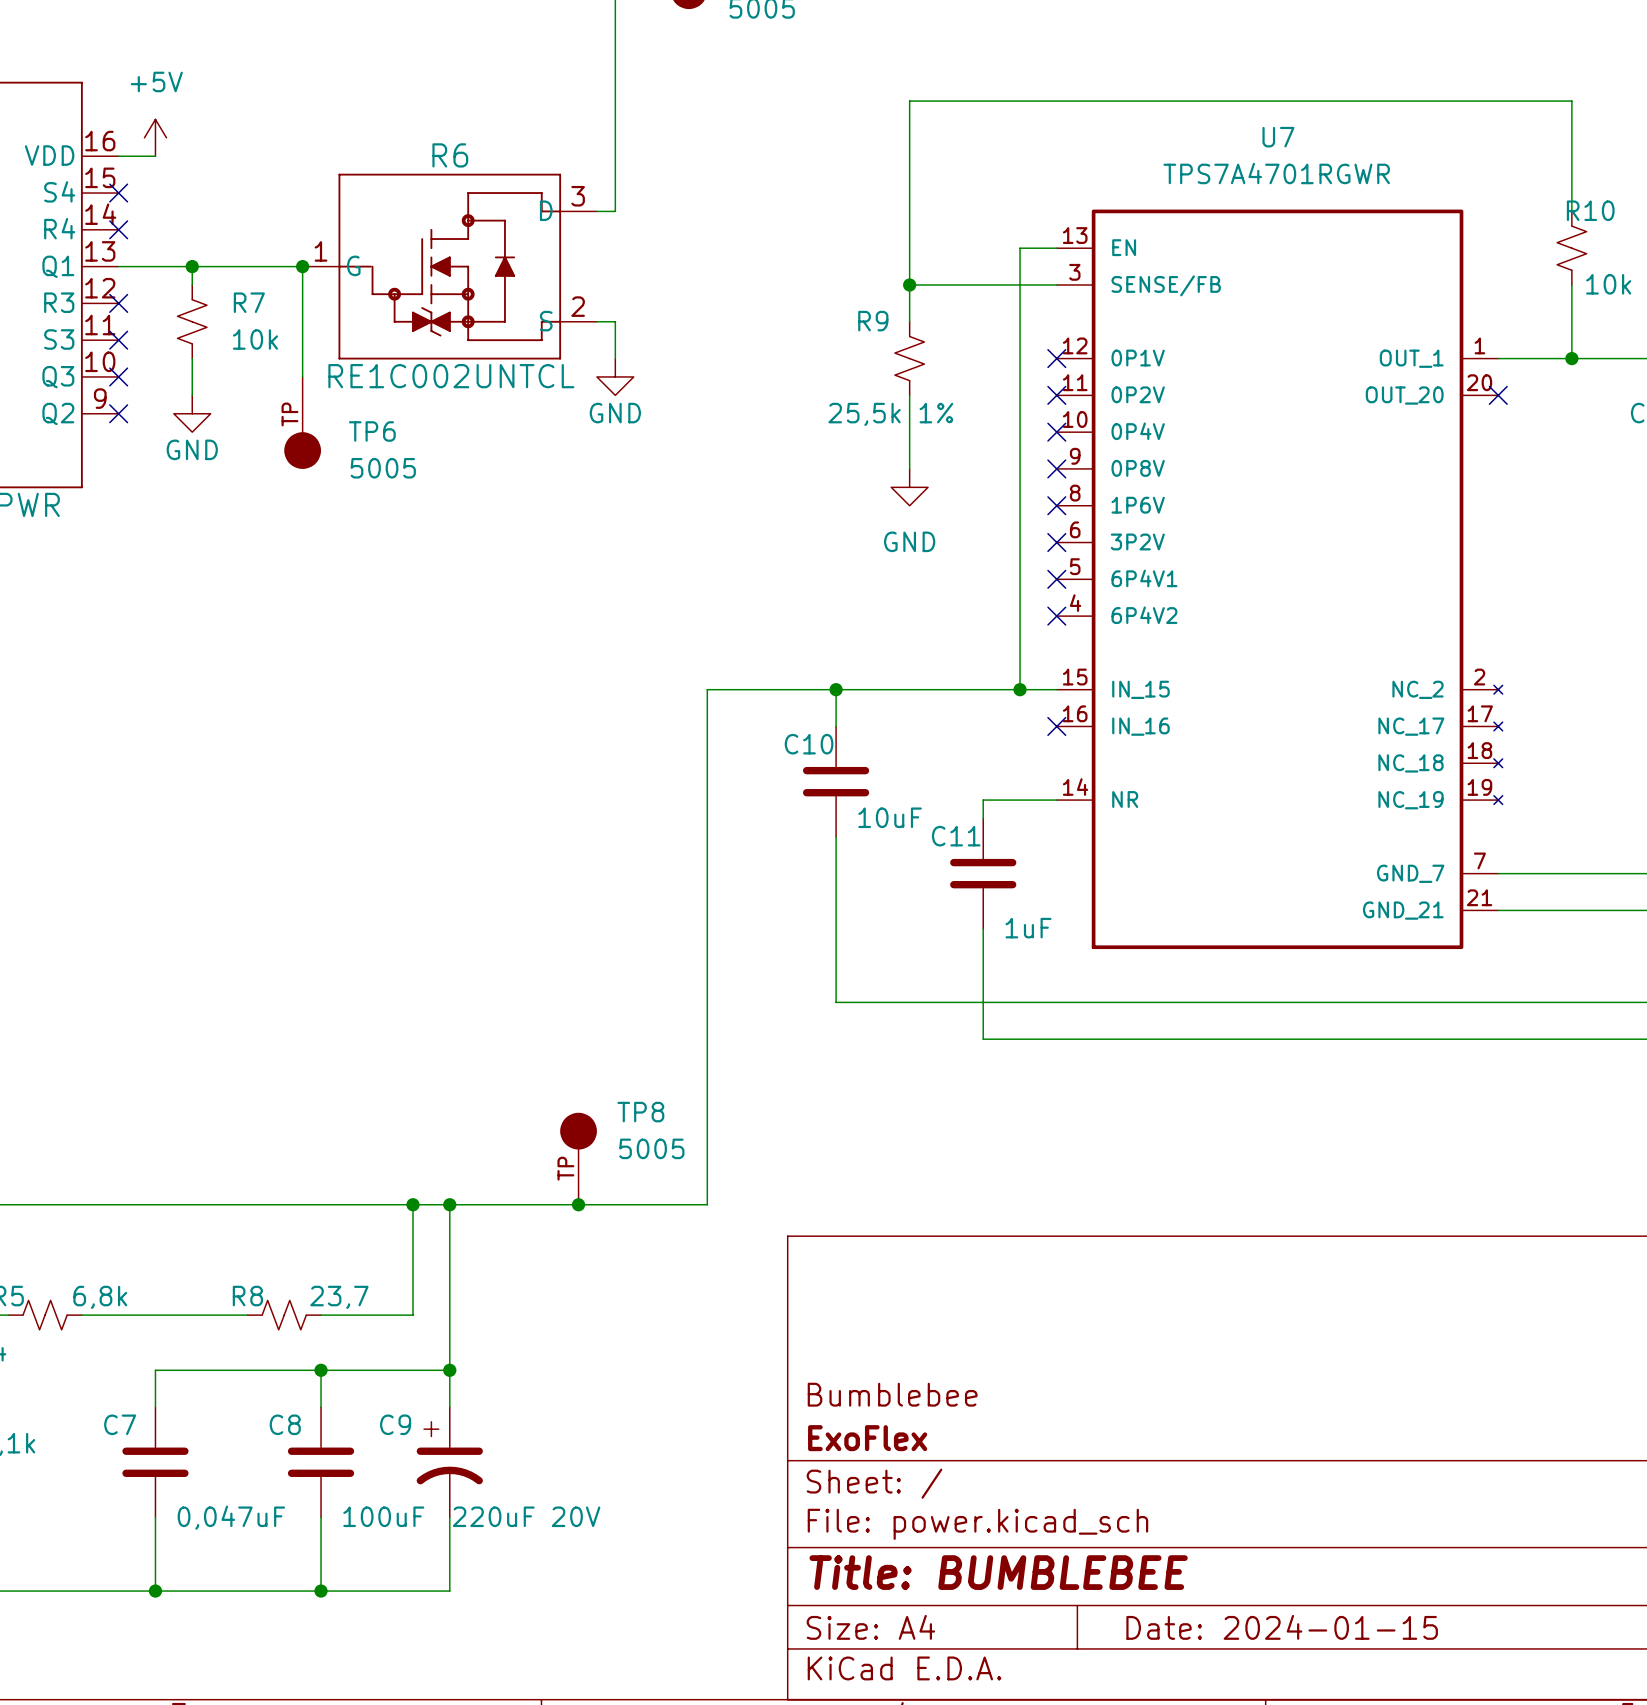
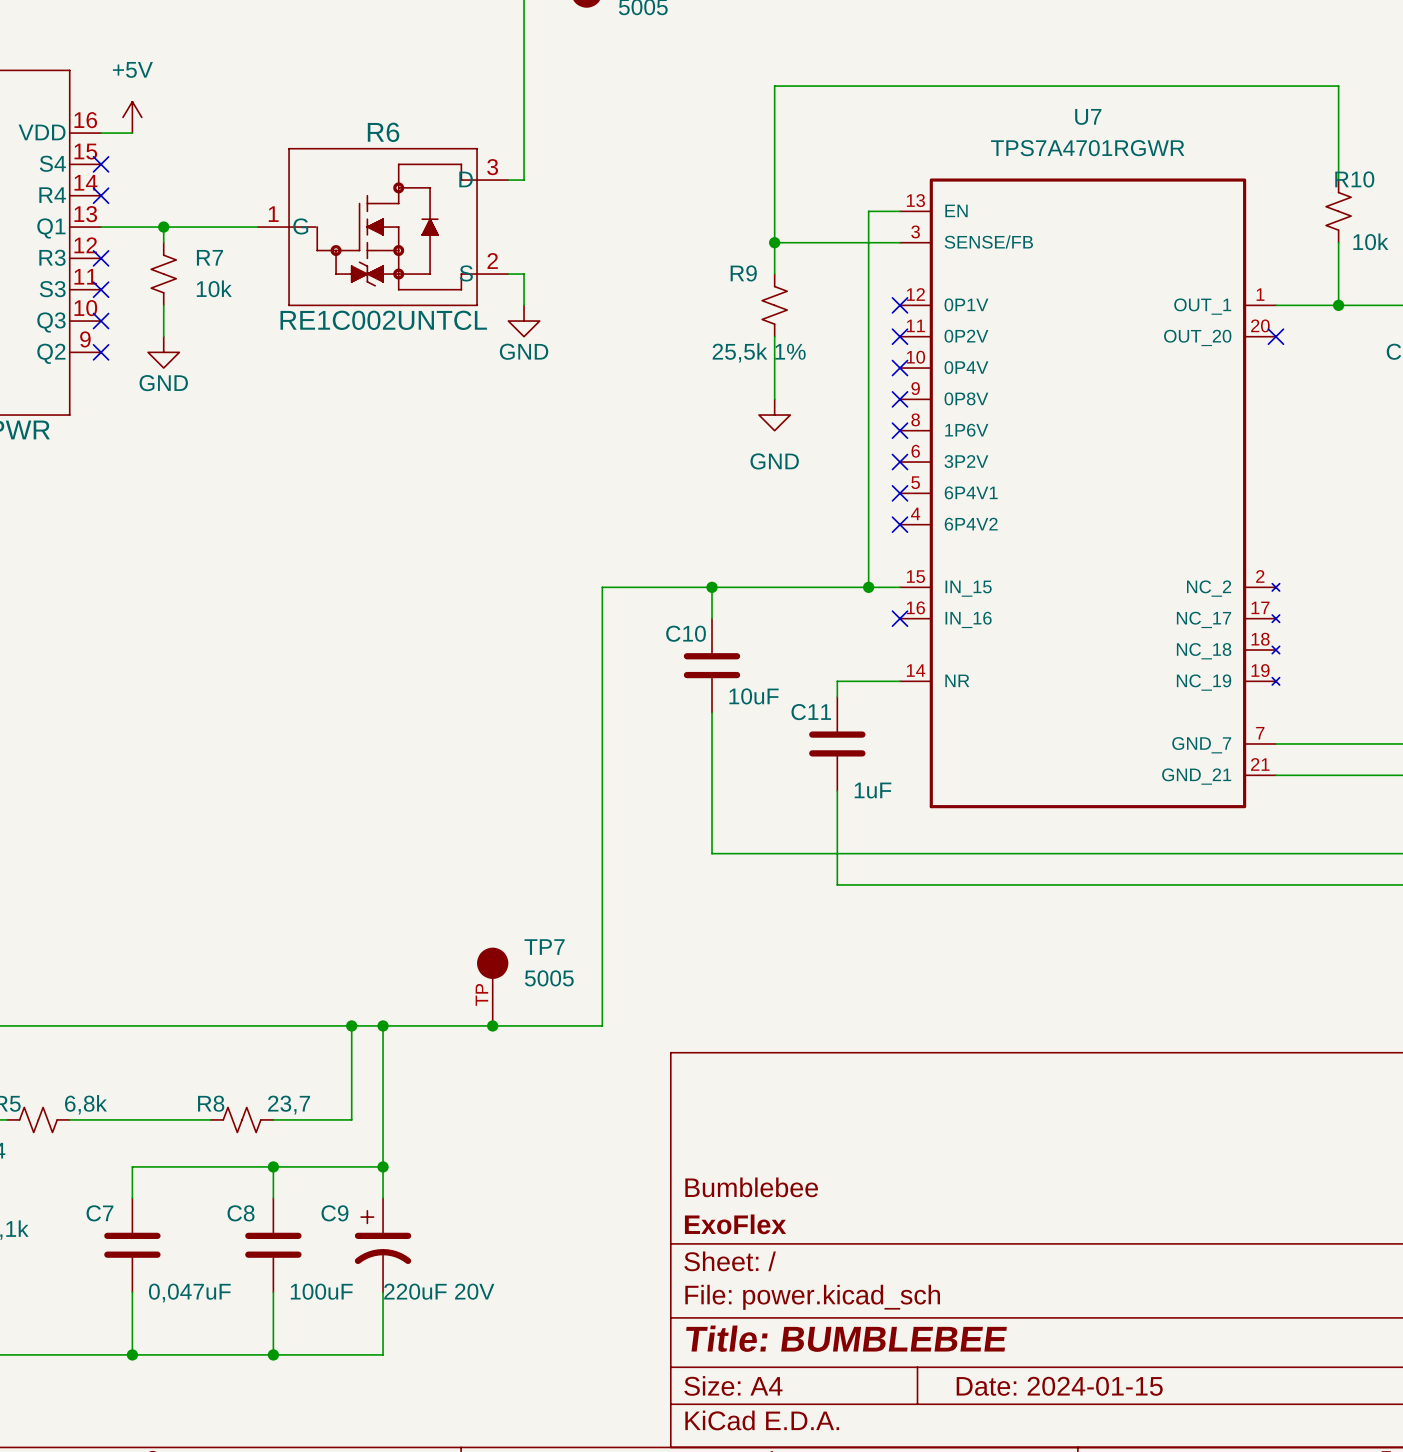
wire: (302, 266) (302, 376) -> none
junction: (302, 266) -> none
TP6: 5005 (302, 422) -> none
TP8 name: TP8 (640, 1112) -> TP7 (544, 947)

